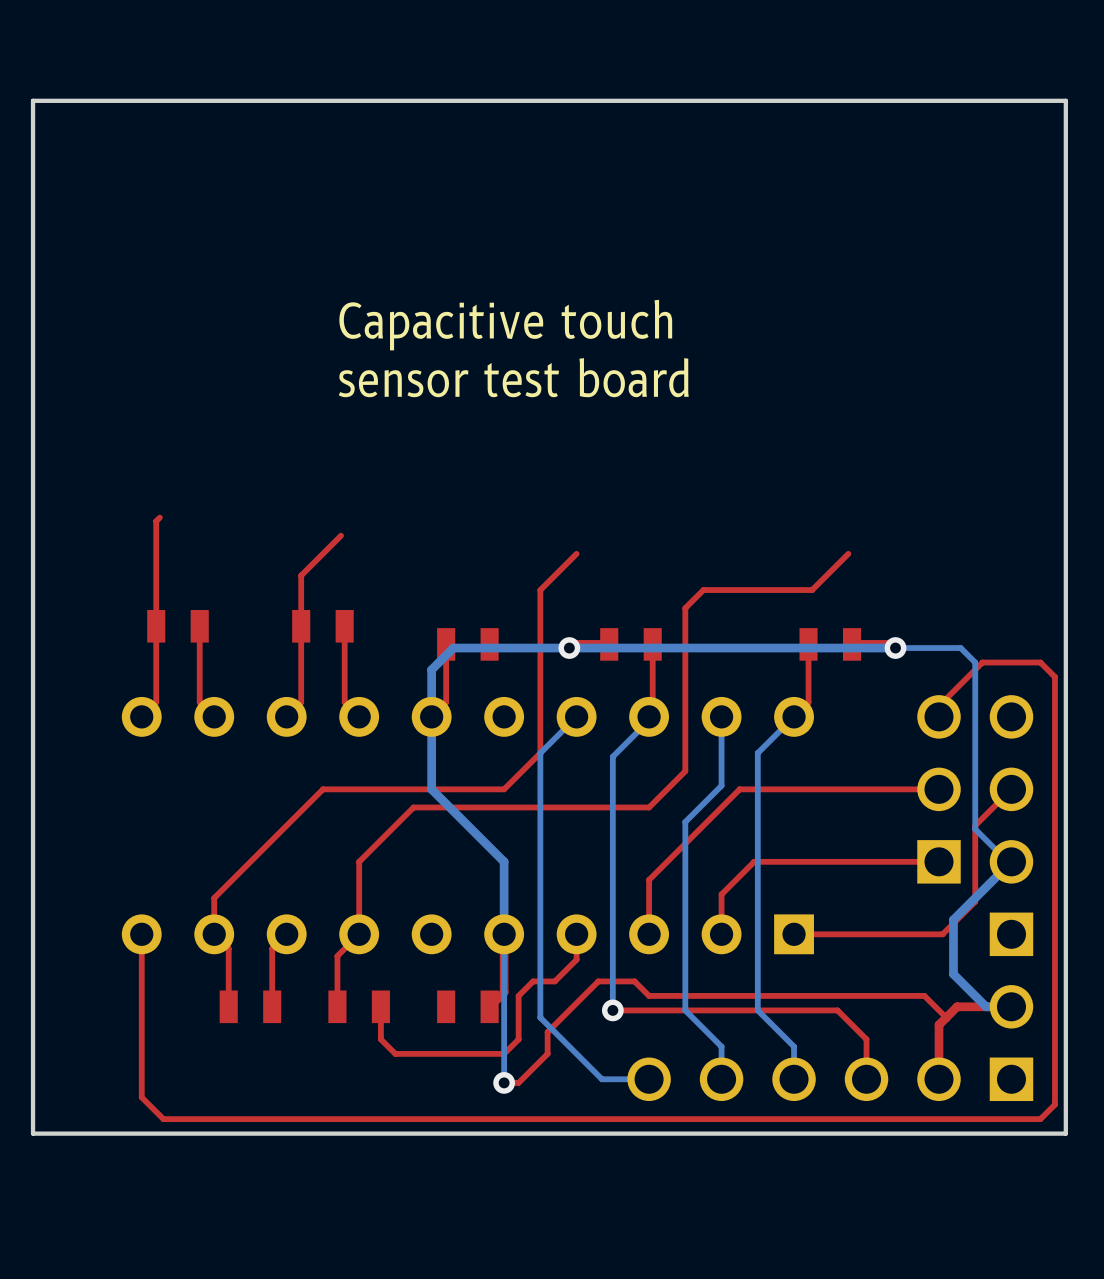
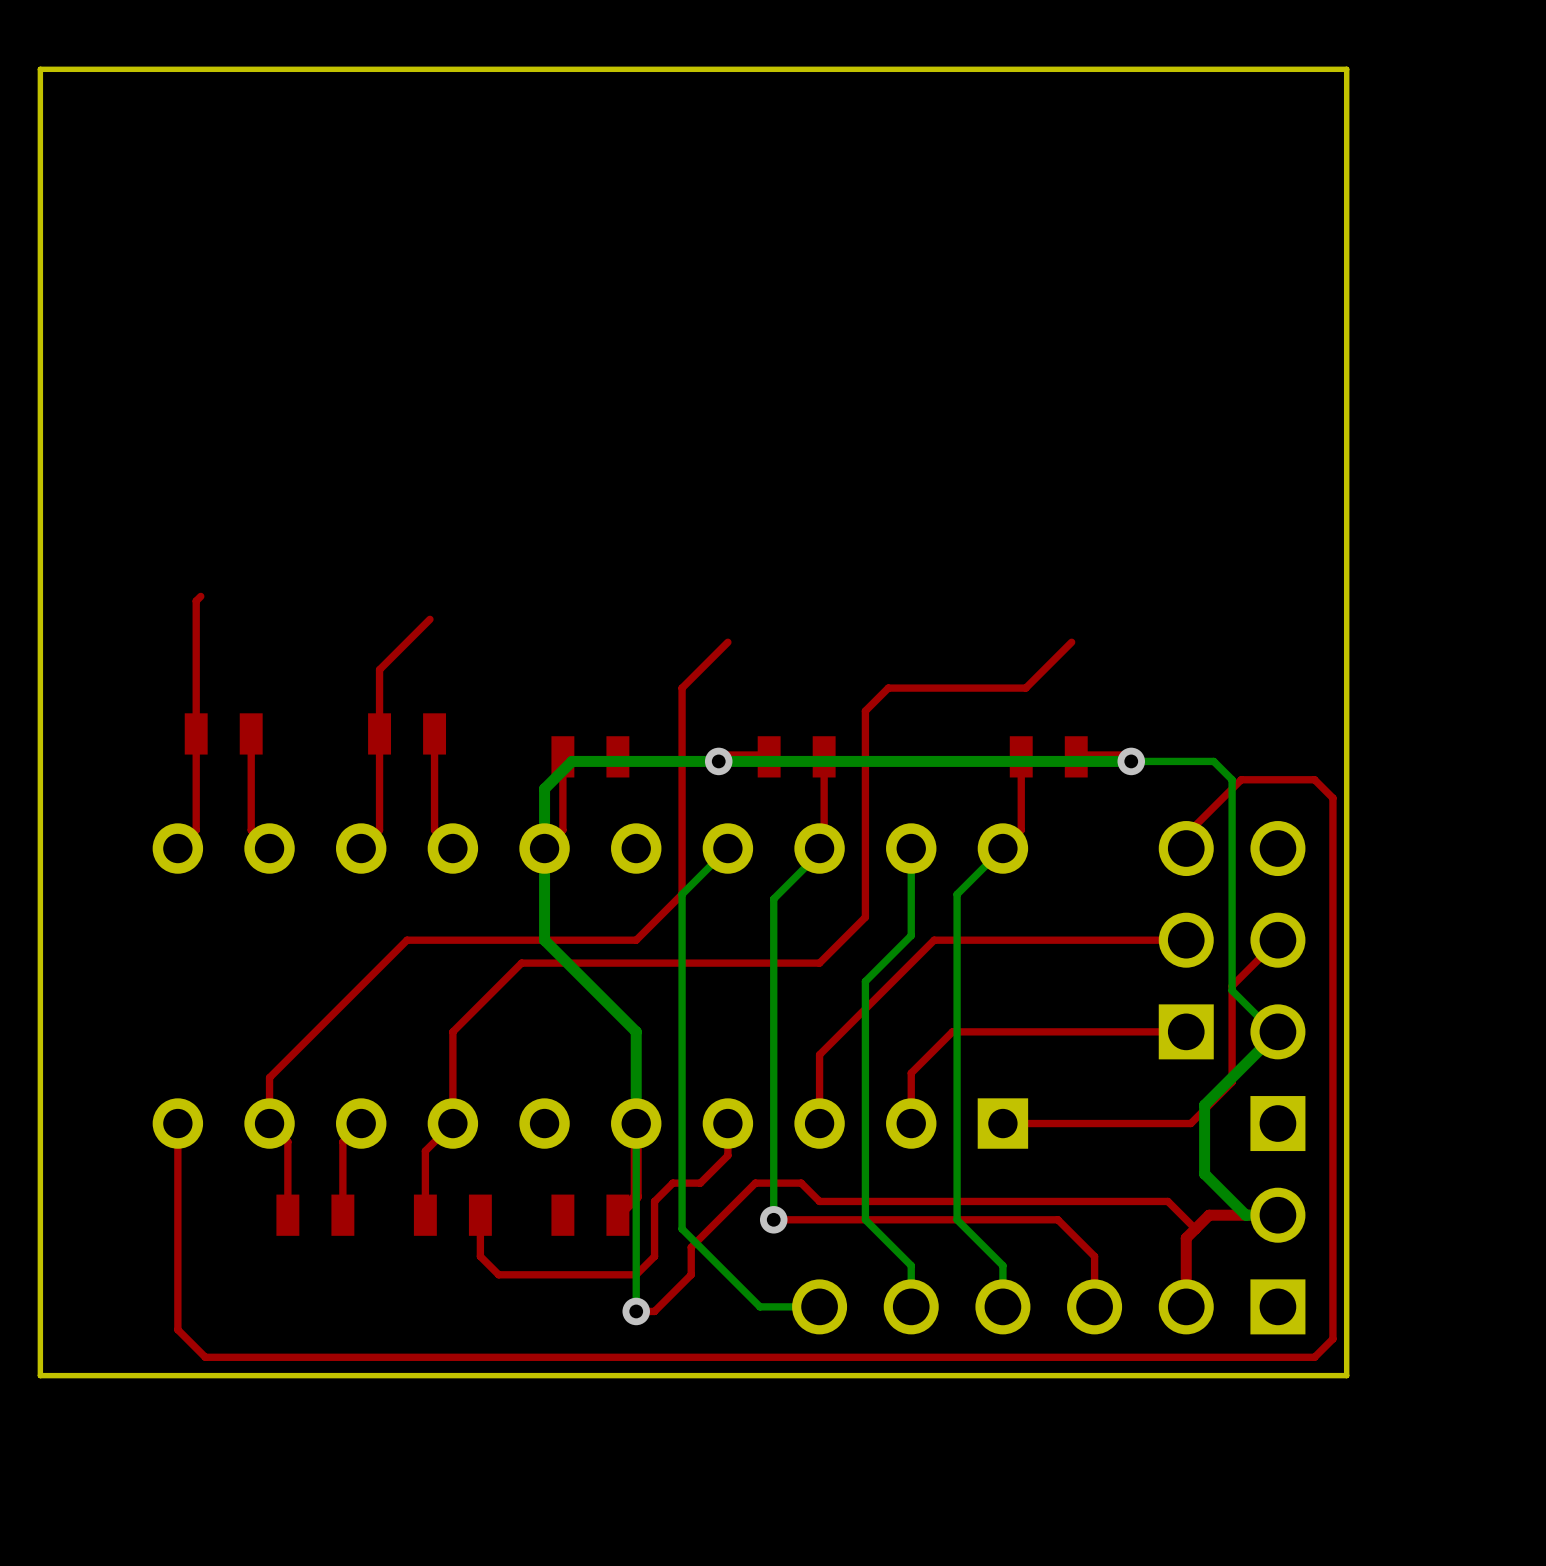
text: Capacitive touch (505, 325) -> none
text: sensor test board (513, 377) -> none

